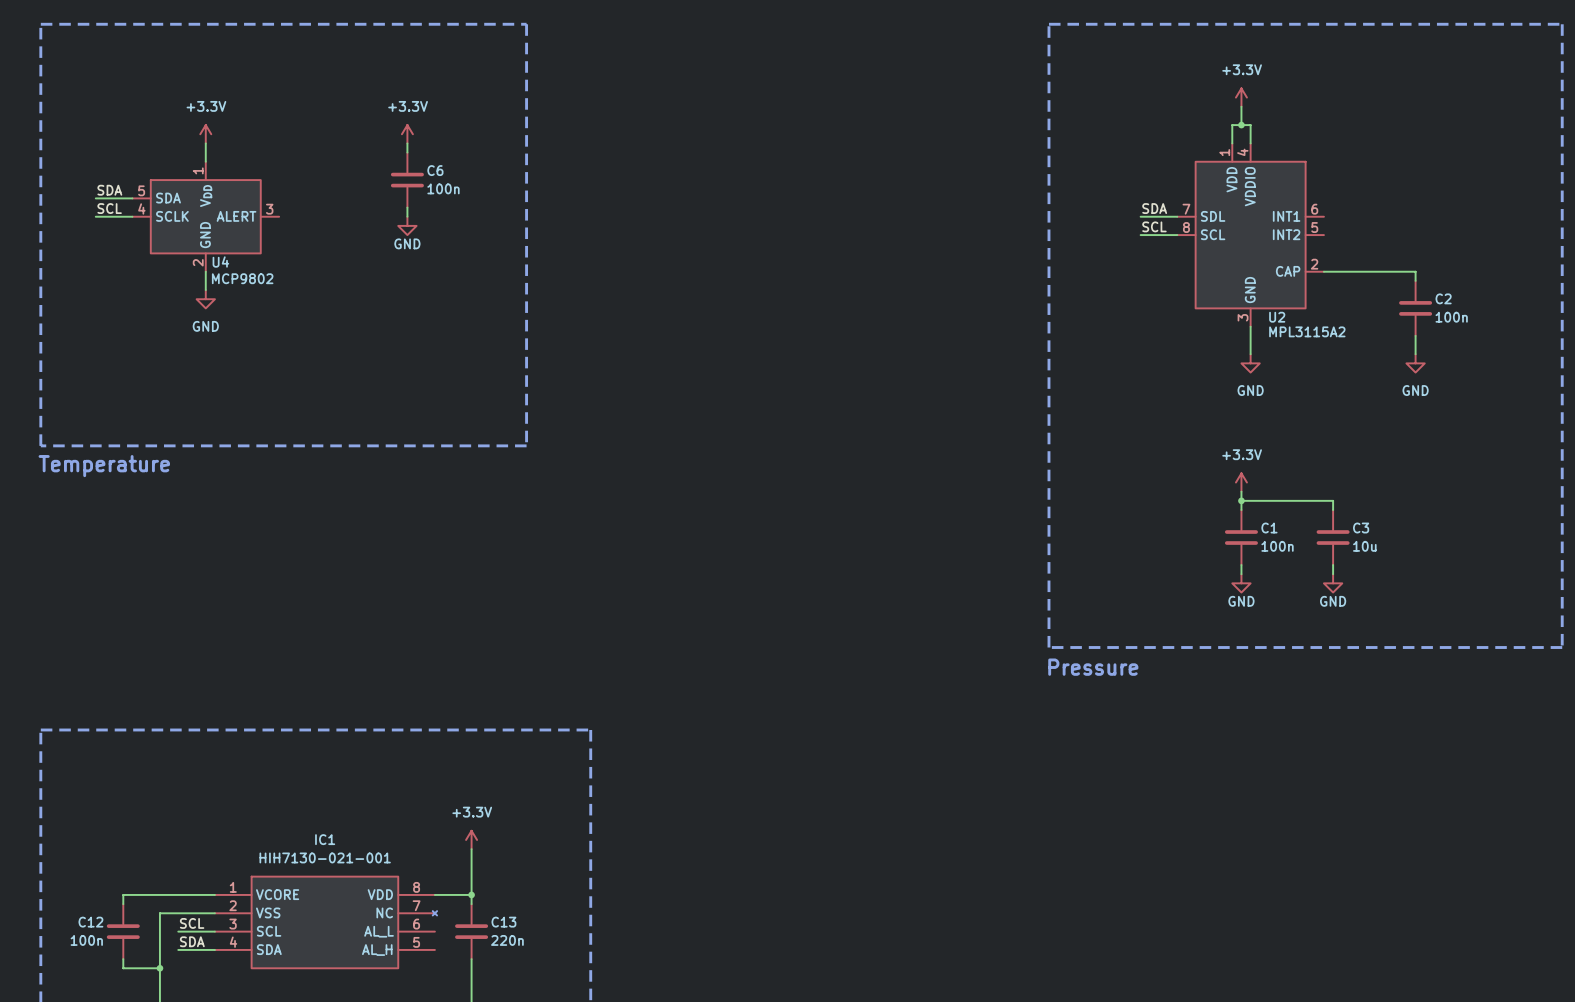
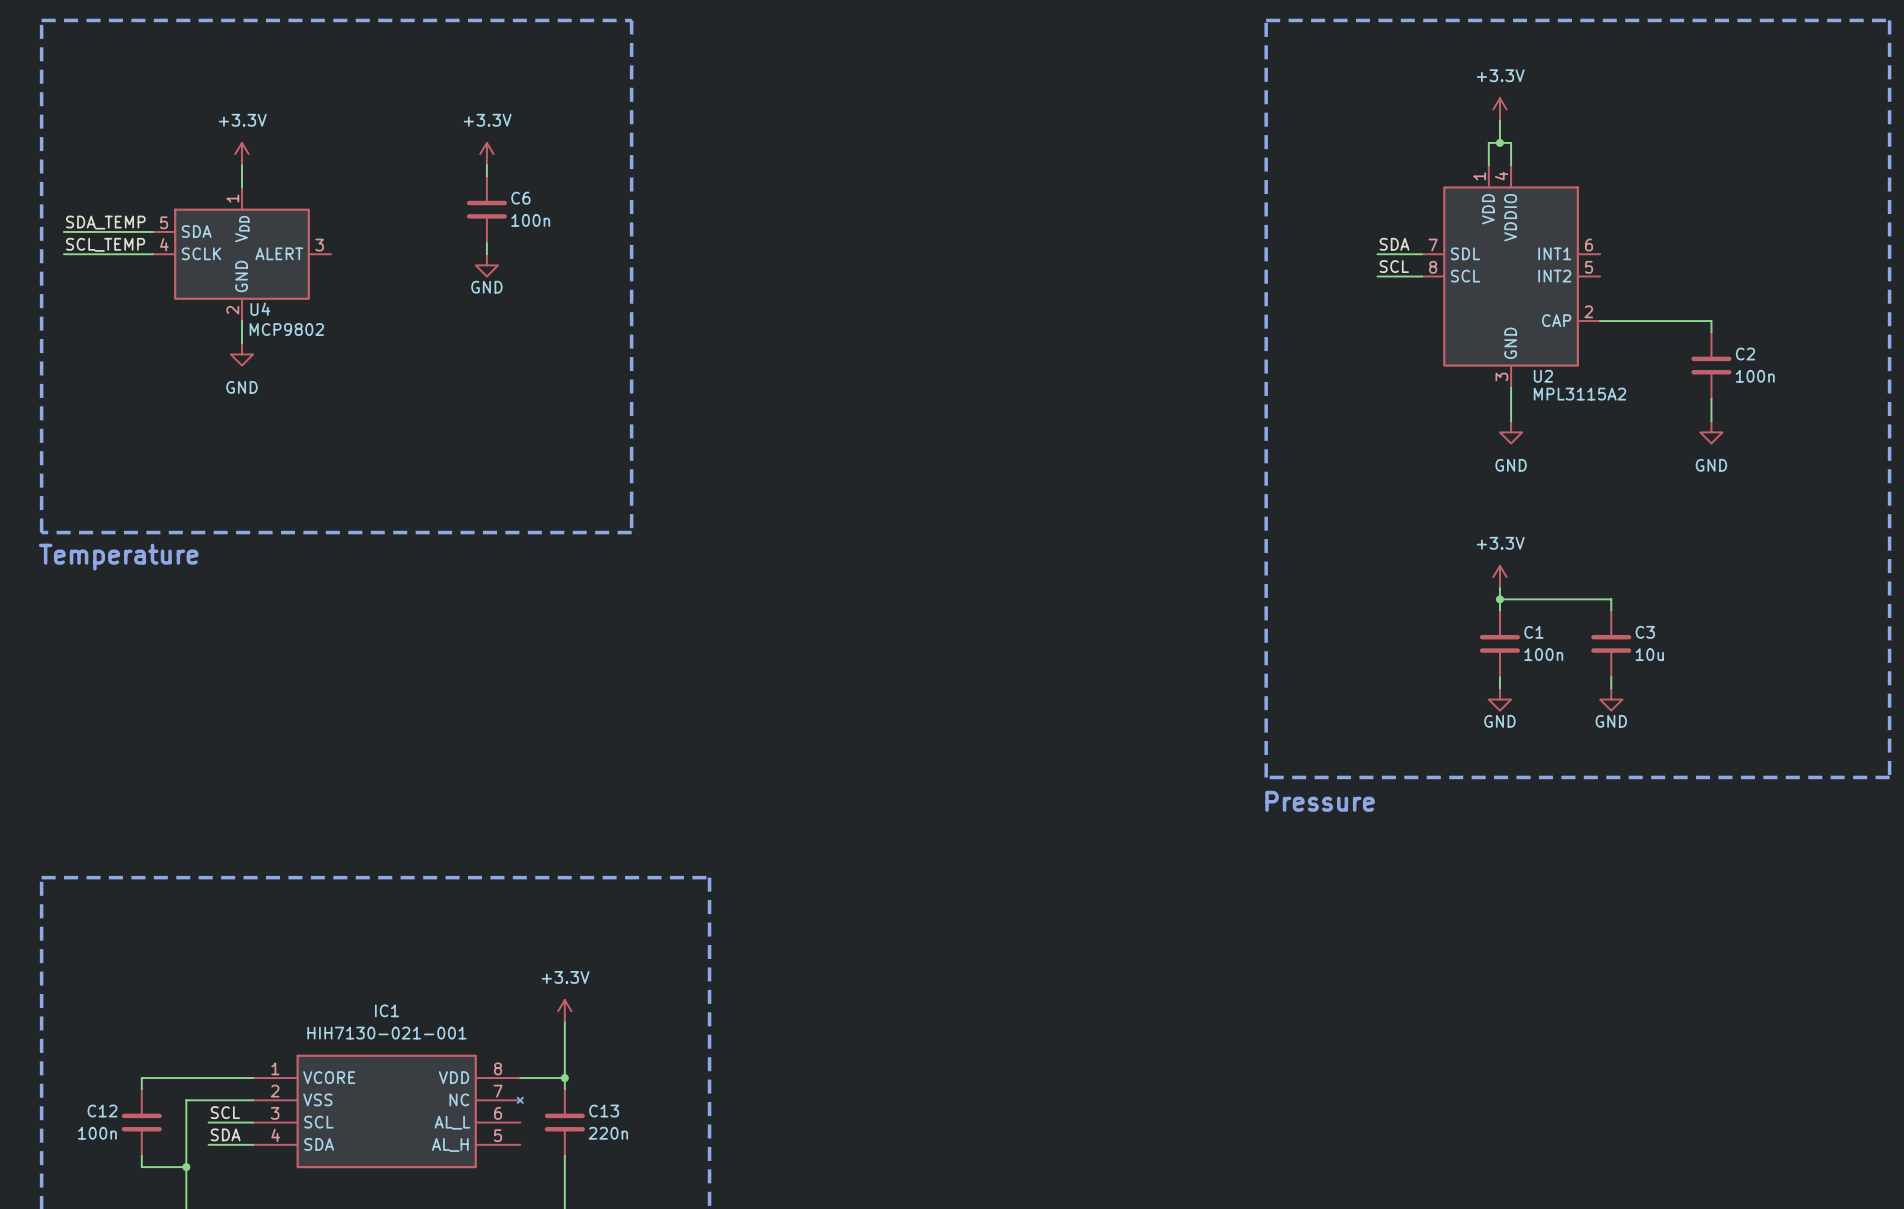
label: none -> SDA_TEMP (105, 222)
label: SDA (109, 190) -> none
wire: none -> (63, 231) (108, 231)
label: none -> SCL_TEMP (105, 244)
label: SCL (109, 208) -> none
wire: none -> (63, 254) (108, 254)

